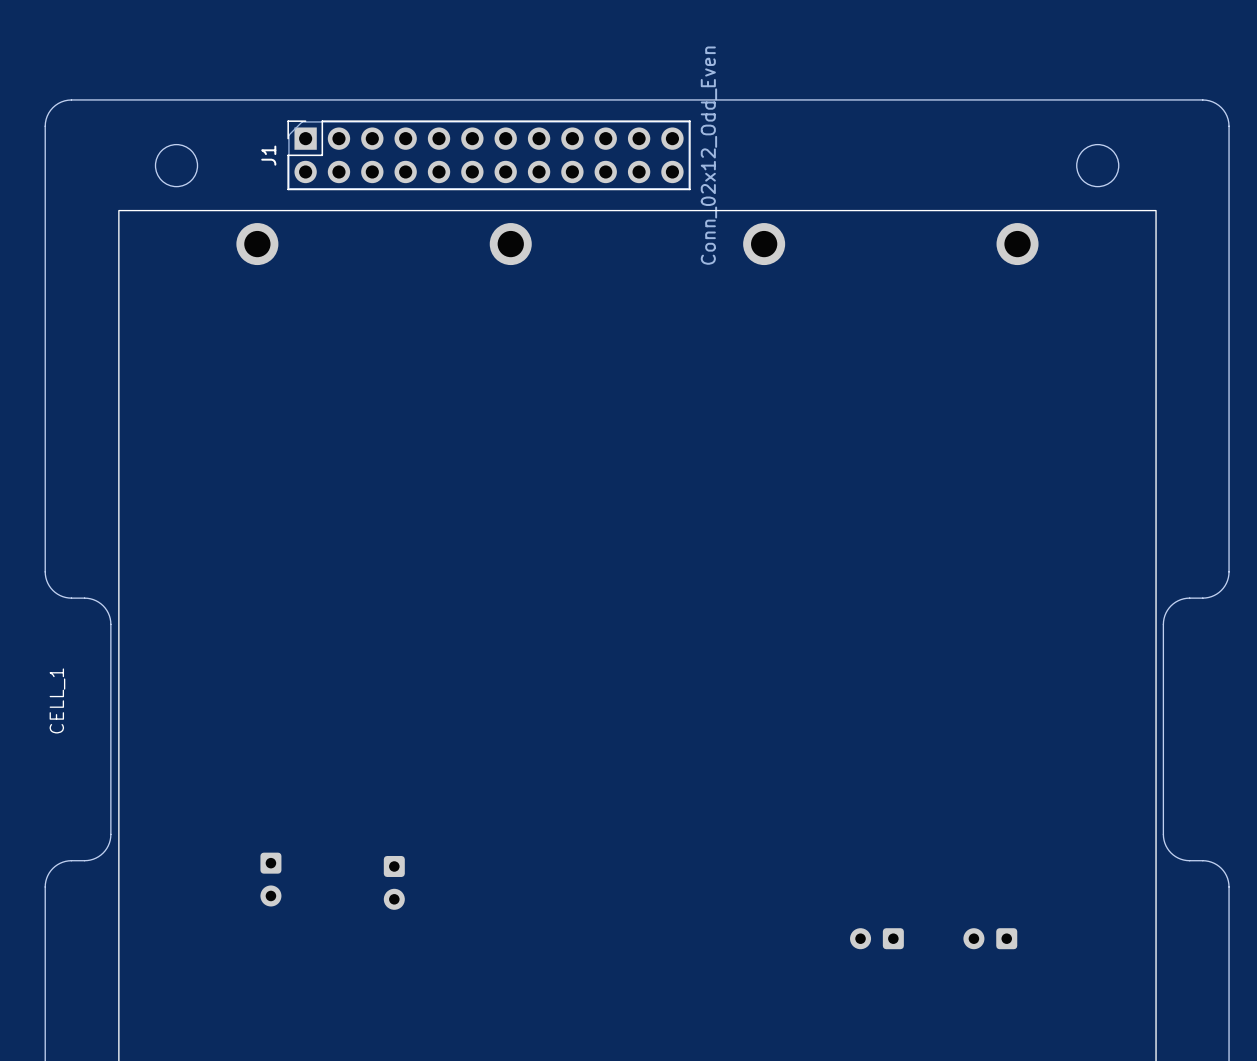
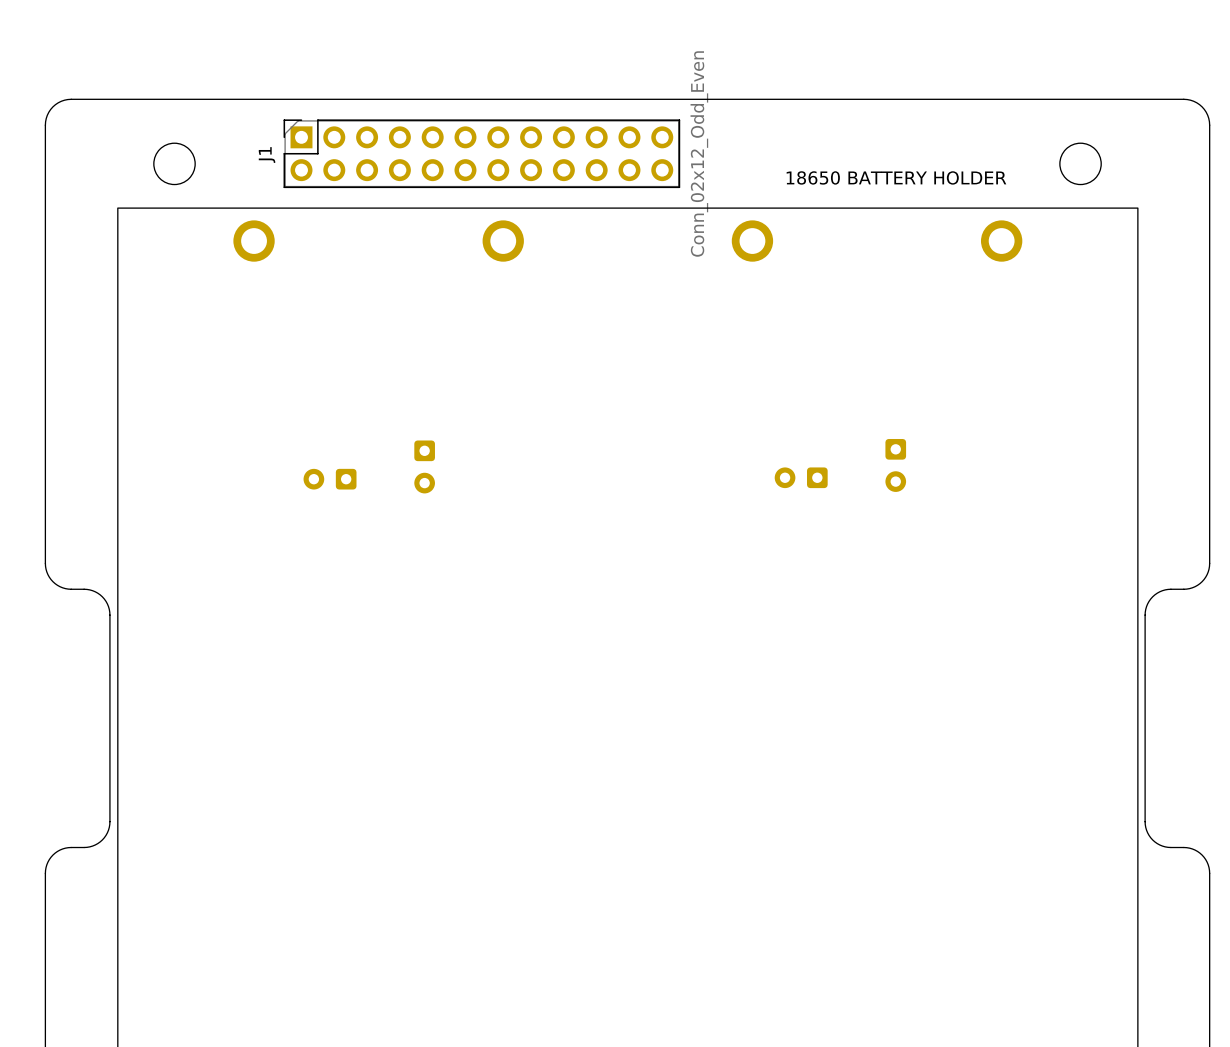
part: none -> (895, 465)
part: none -> (424, 466)
part: none -> (801, 477)
part: none -> (330, 479)
CELL_1 name: CELL_1 (57, 700) -> 18650 BATTERY HOLDER (896, 177)
part: (270, 879) -> none
part: (394, 882) -> none
part: (876, 938) -> none
part: (990, 938) -> none

